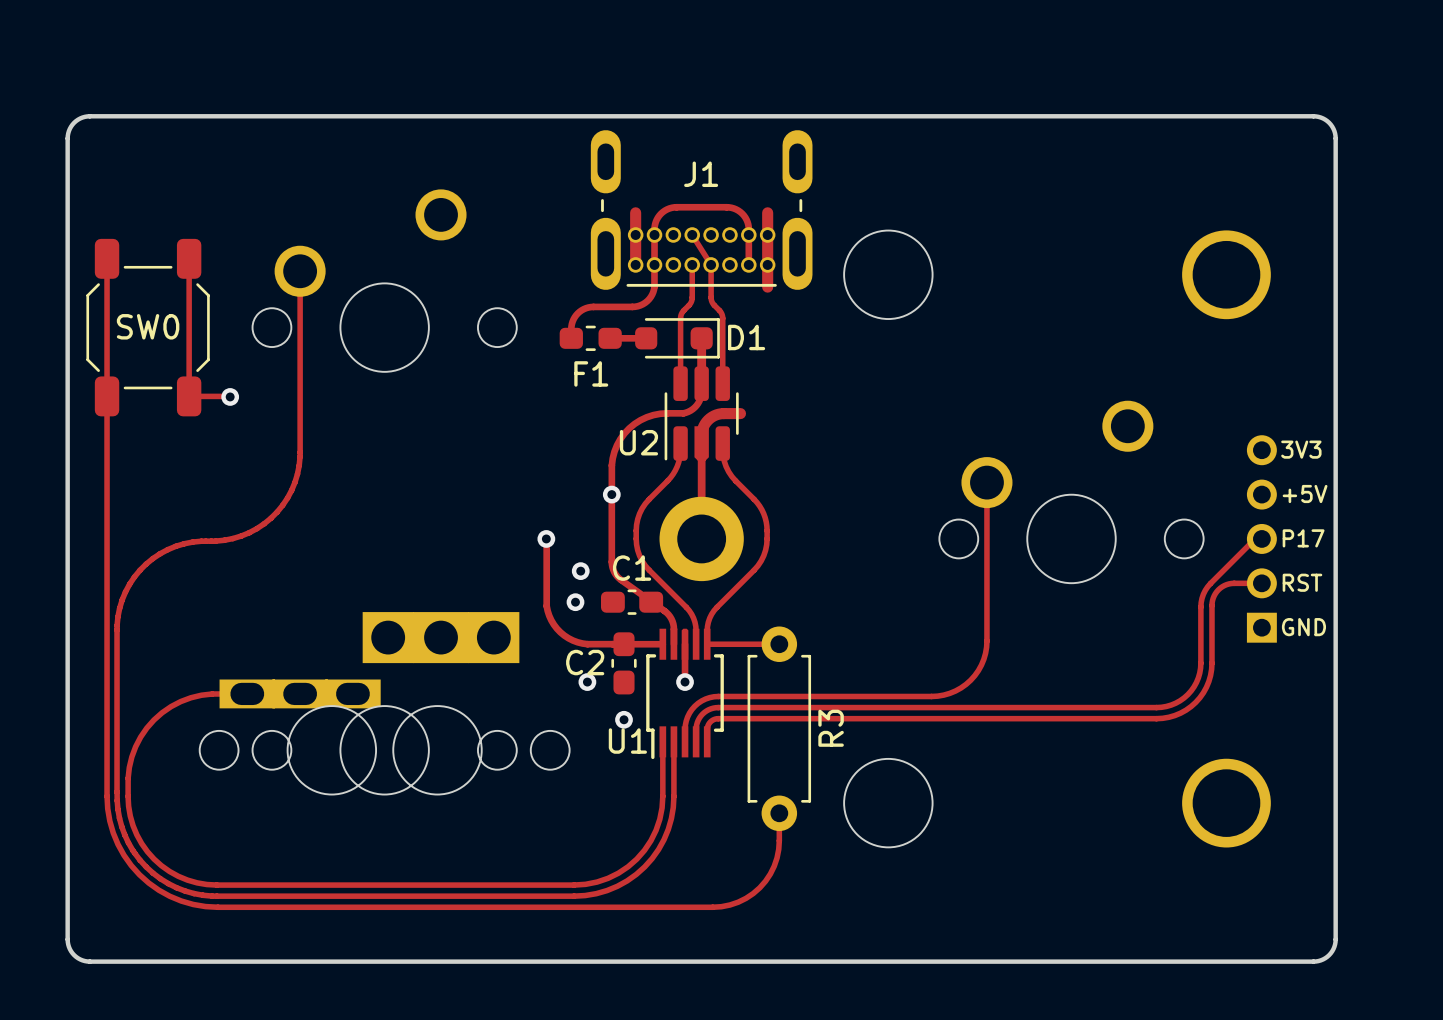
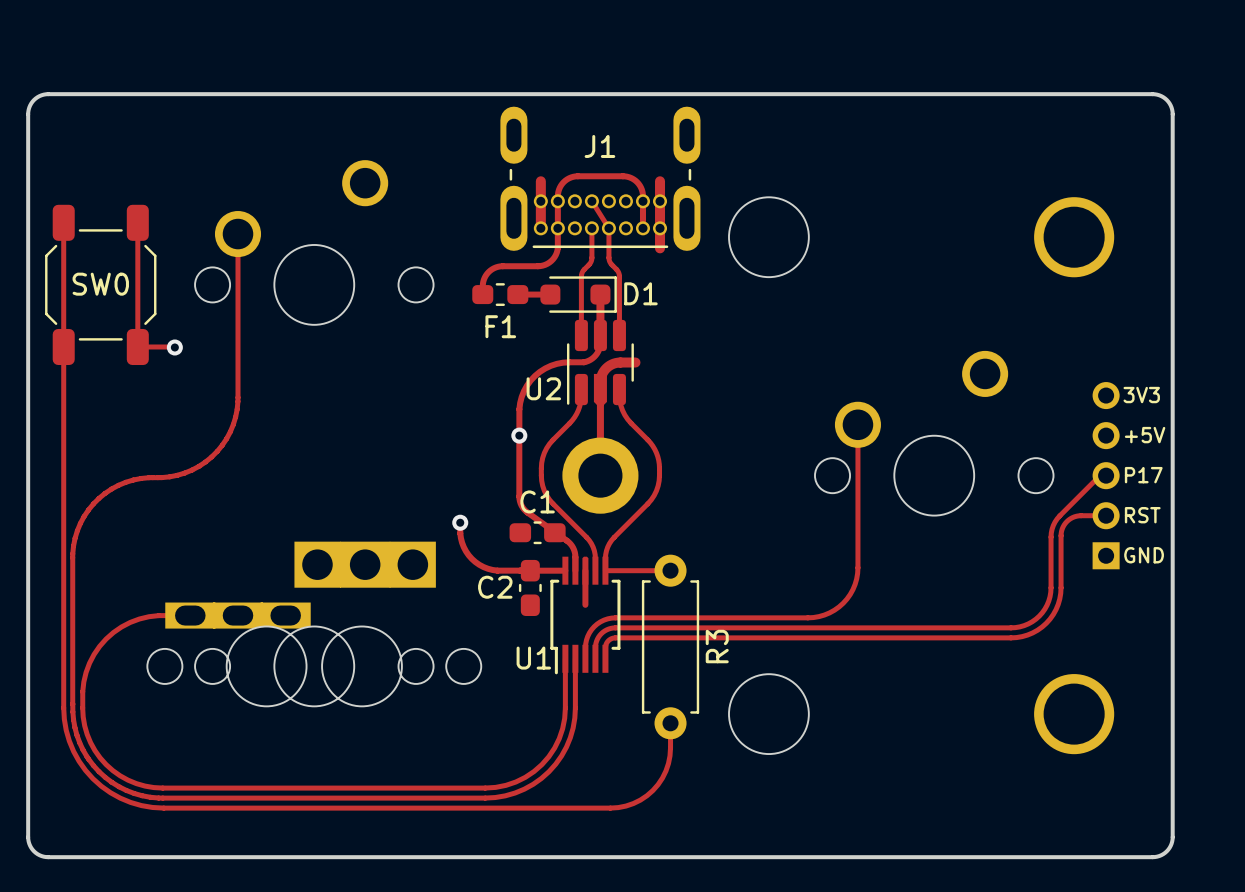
track: (546, 538) (546, 606) (549, 615) (556, 628) (564, 635) (572, 640) (587, 644) -> (460, 522) (462, 542) (468, 555) (479, 564) (497, 570)
via: (546, 538) -> none
via: (580, 571) -> none
via: none -> (460, 522)
via: (575, 602) -> none
via: (587, 682) -> none
via: (685, 682) -> none
via: (624, 719) -> none

